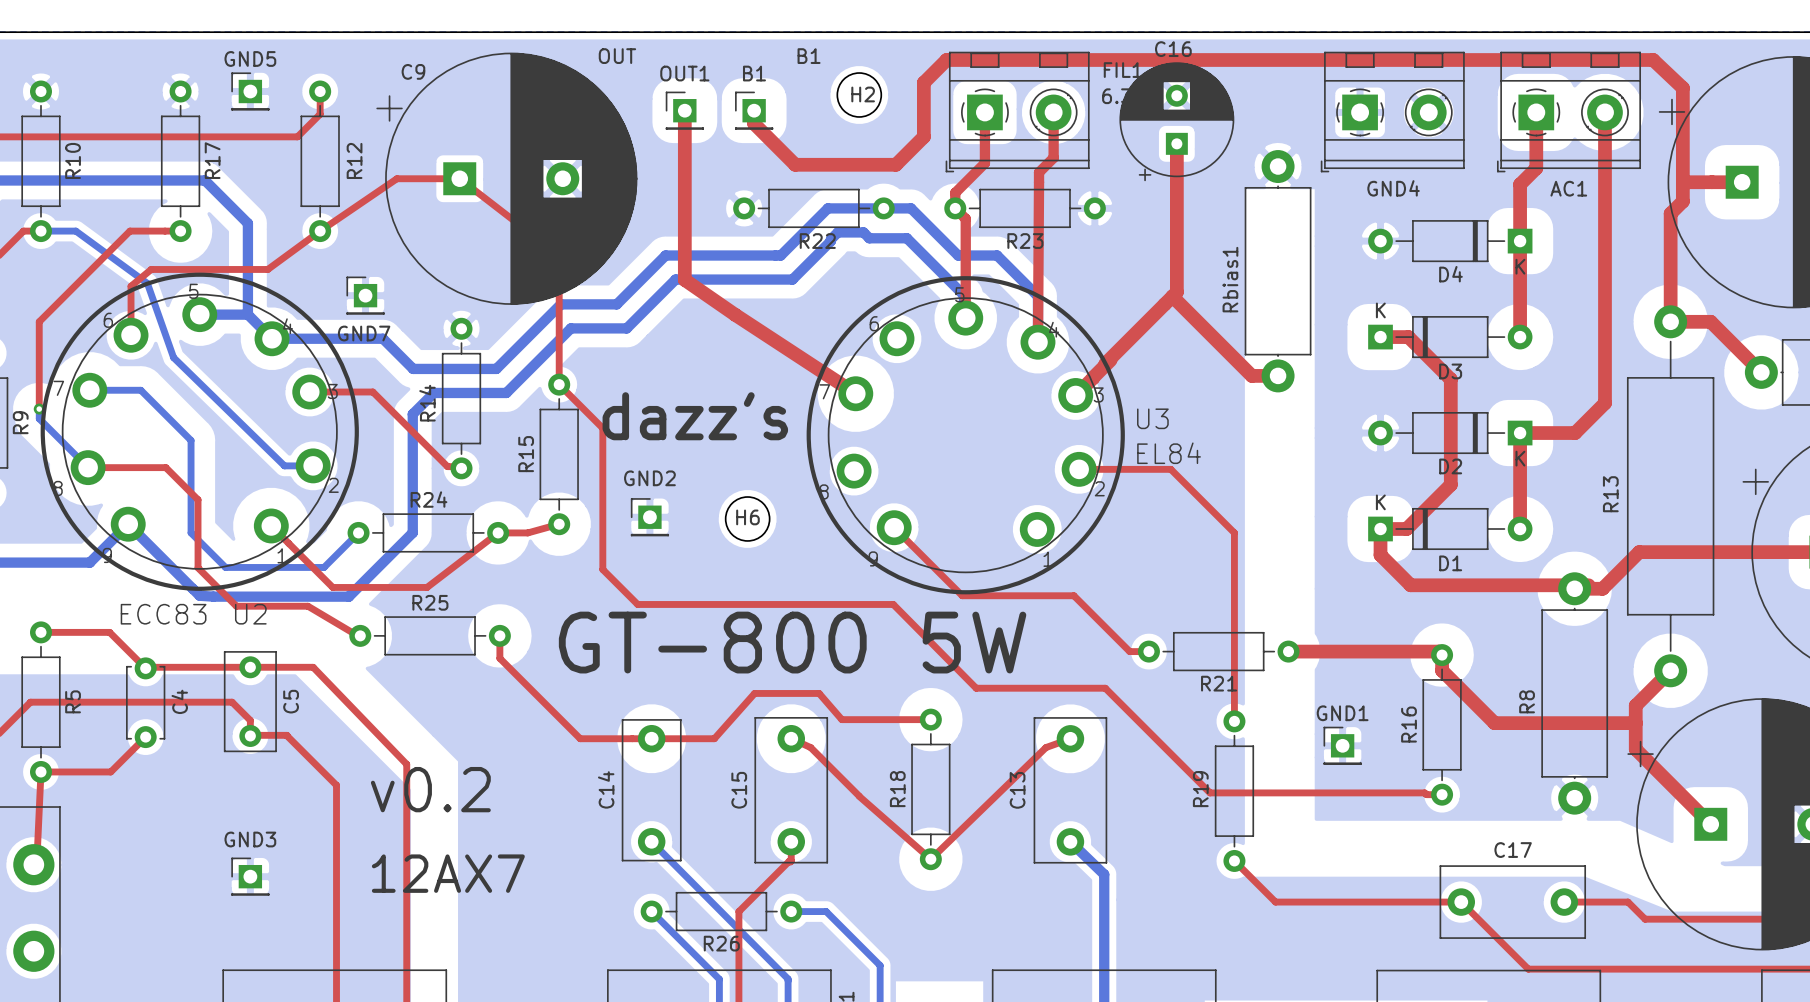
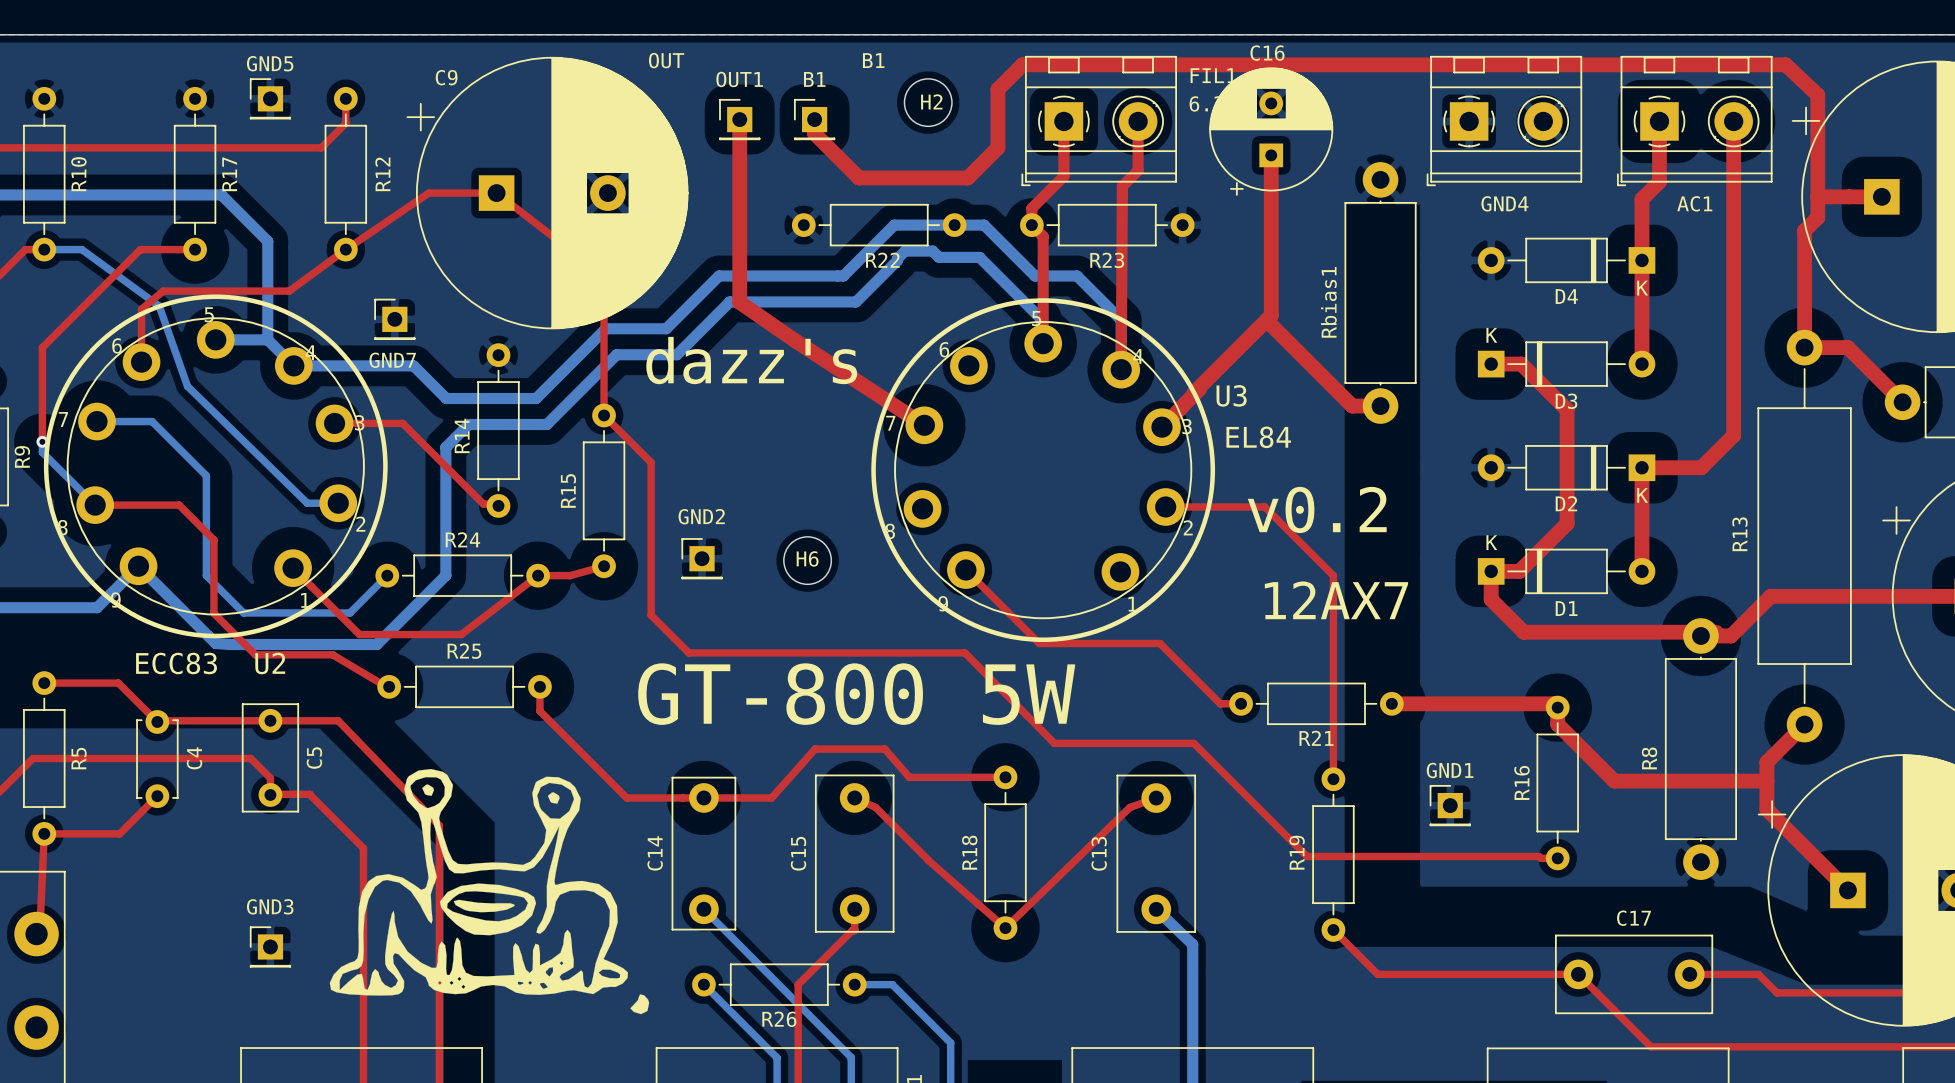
text position: dazz's (695, 416) -> dazz's (751, 360)
U3 name position: U3 (1152, 418) -> U3 (1231, 395)
U3 value position: EL84 (1169, 453) -> EL84 (1258, 437)
text: none -> v0.2 (1317, 509)
text: none -> 12AX7 (1336, 600)
drawing: none -> [329, 768, 650, 1015]
text: v0.2 (430, 789) -> none
text: 12AX7 (448, 873) -> none

